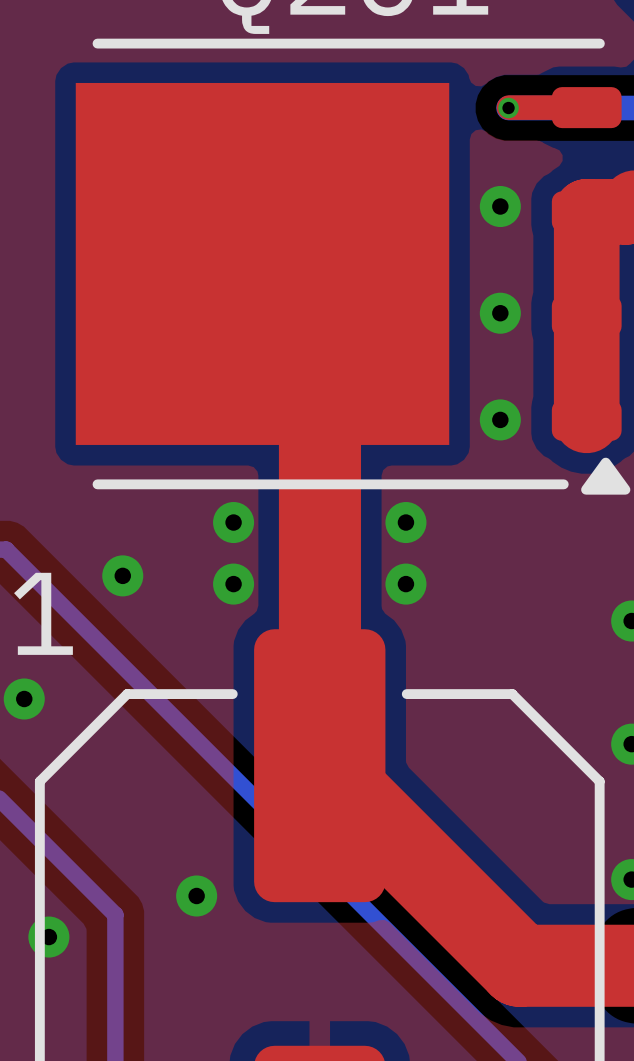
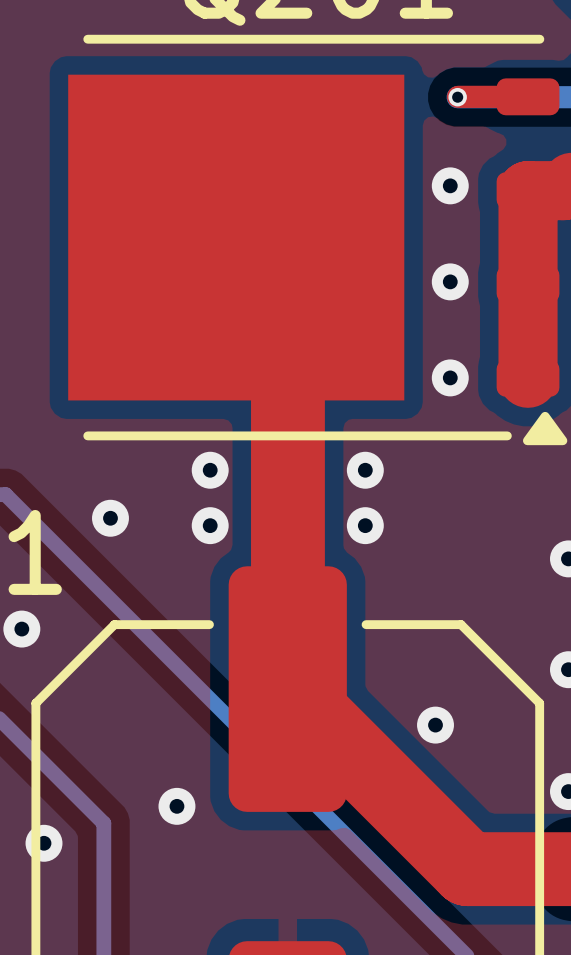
via: none -> (435, 725)

